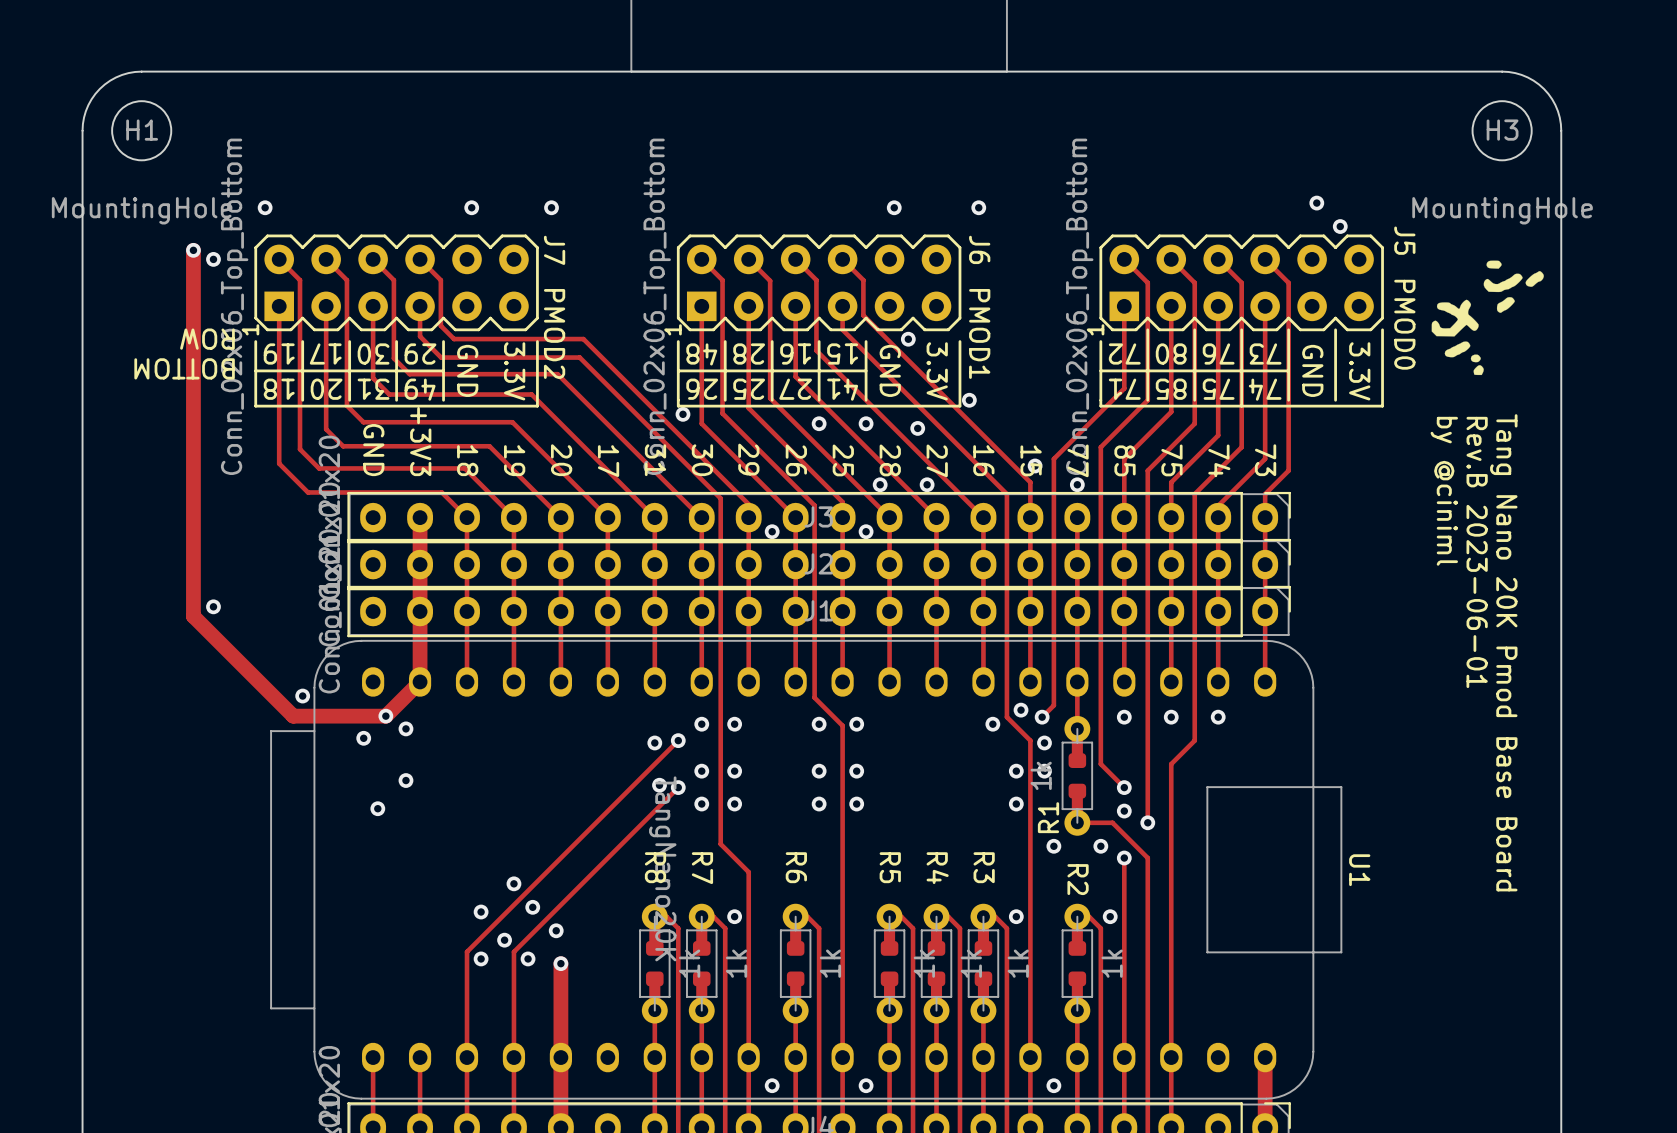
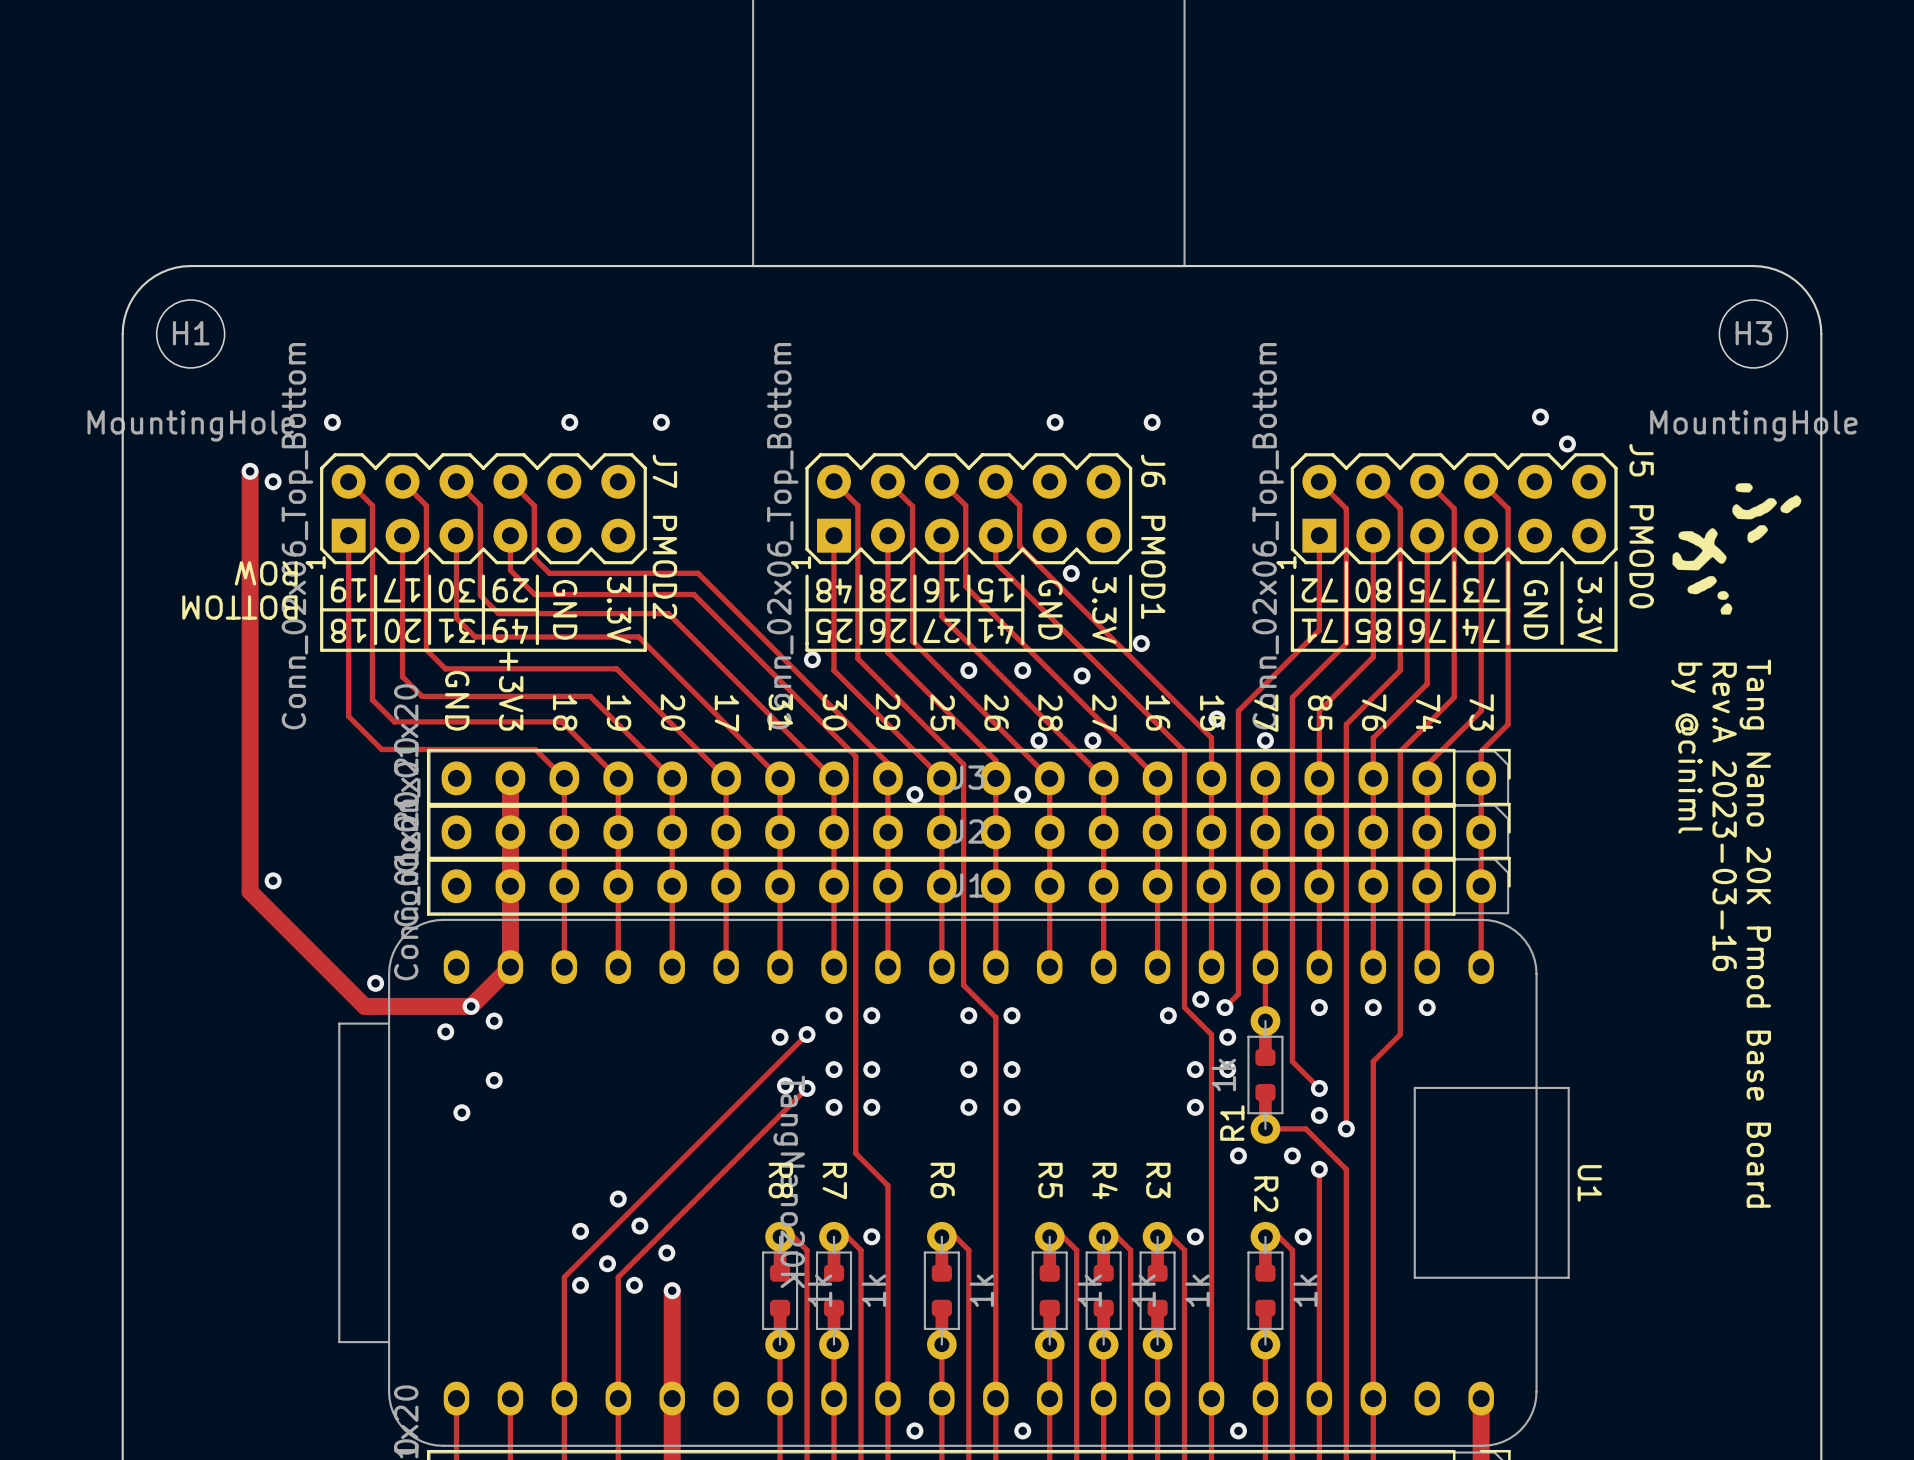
text: 76 (1218, 353) -> 75 (1427, 590)
text: 26 (702, 389) -> 25 (834, 630)
text: 25 (749, 389) -> 26 (888, 630)
text: 75 (1218, 389) -> 76 (1427, 630)
text: 26 (796, 460) -> 25 (942, 712)
text: 25 (843, 460) -> 26 (996, 712)
text: 75 (1171, 460) -> 76 (1374, 712)
text: Rev.B 2023-06-01 (1477, 552) -> Rev.A 2023-03-16 (1724, 816)

